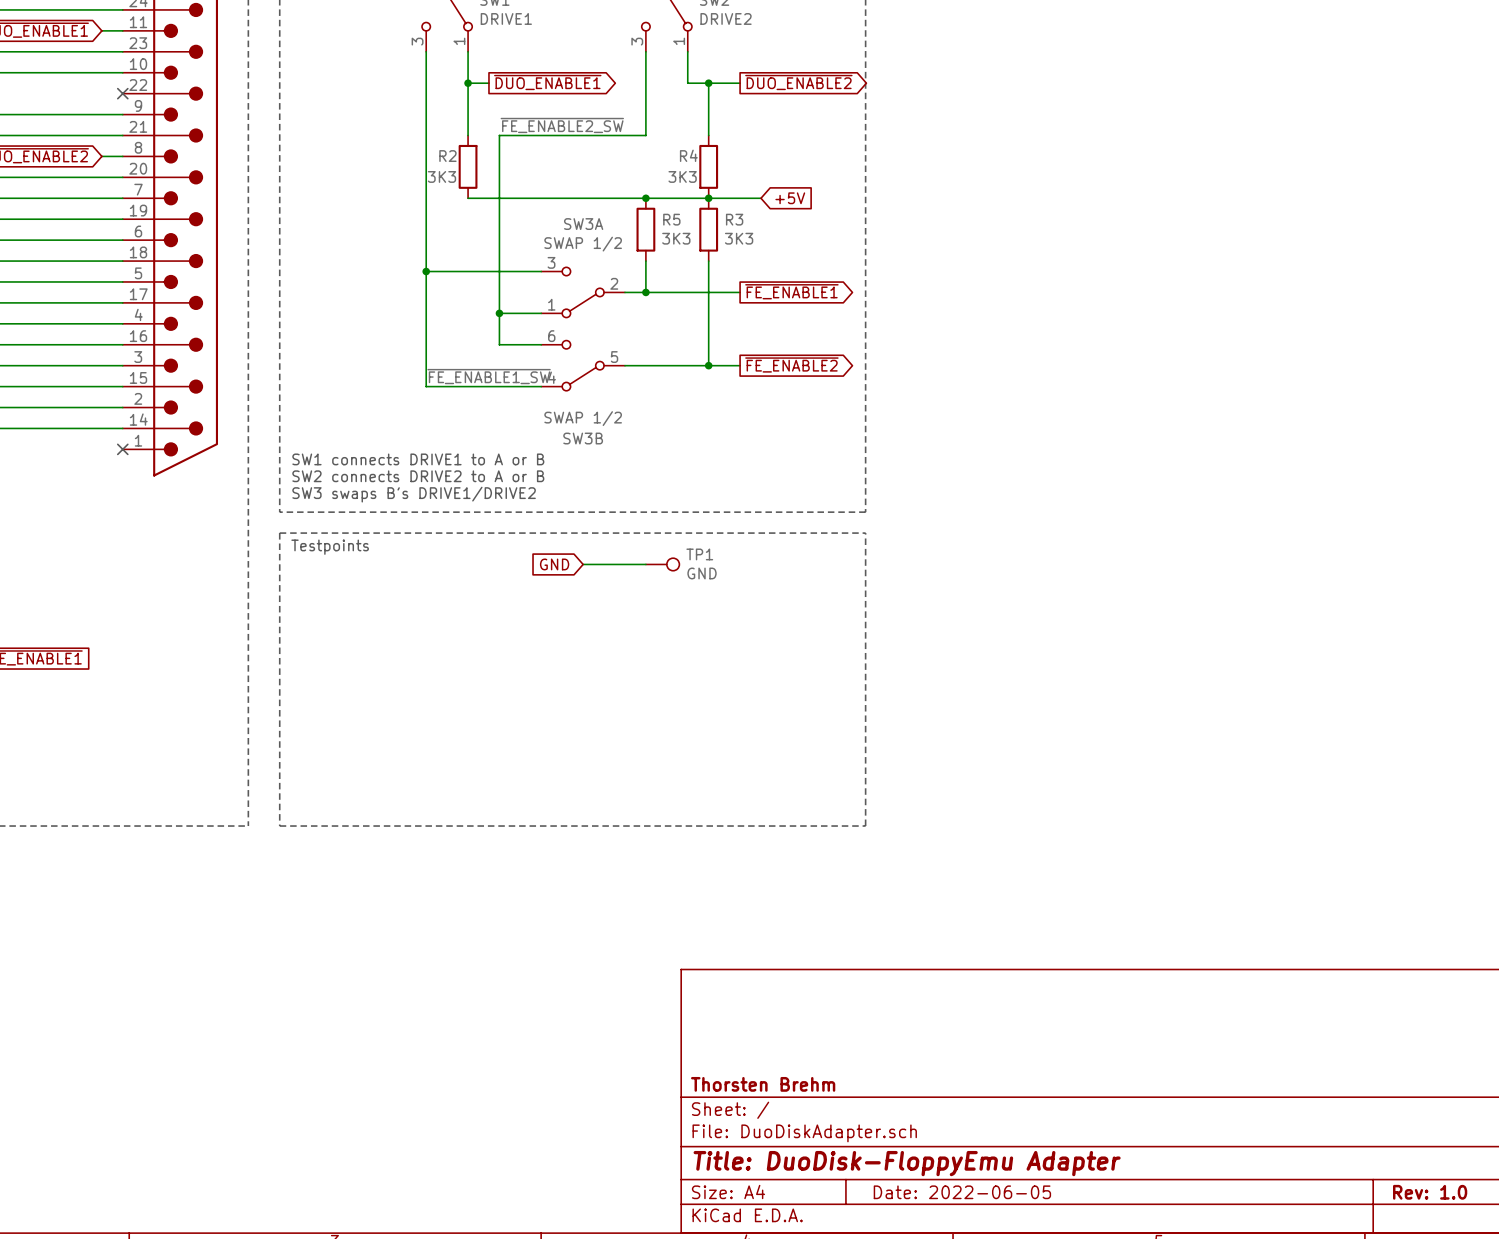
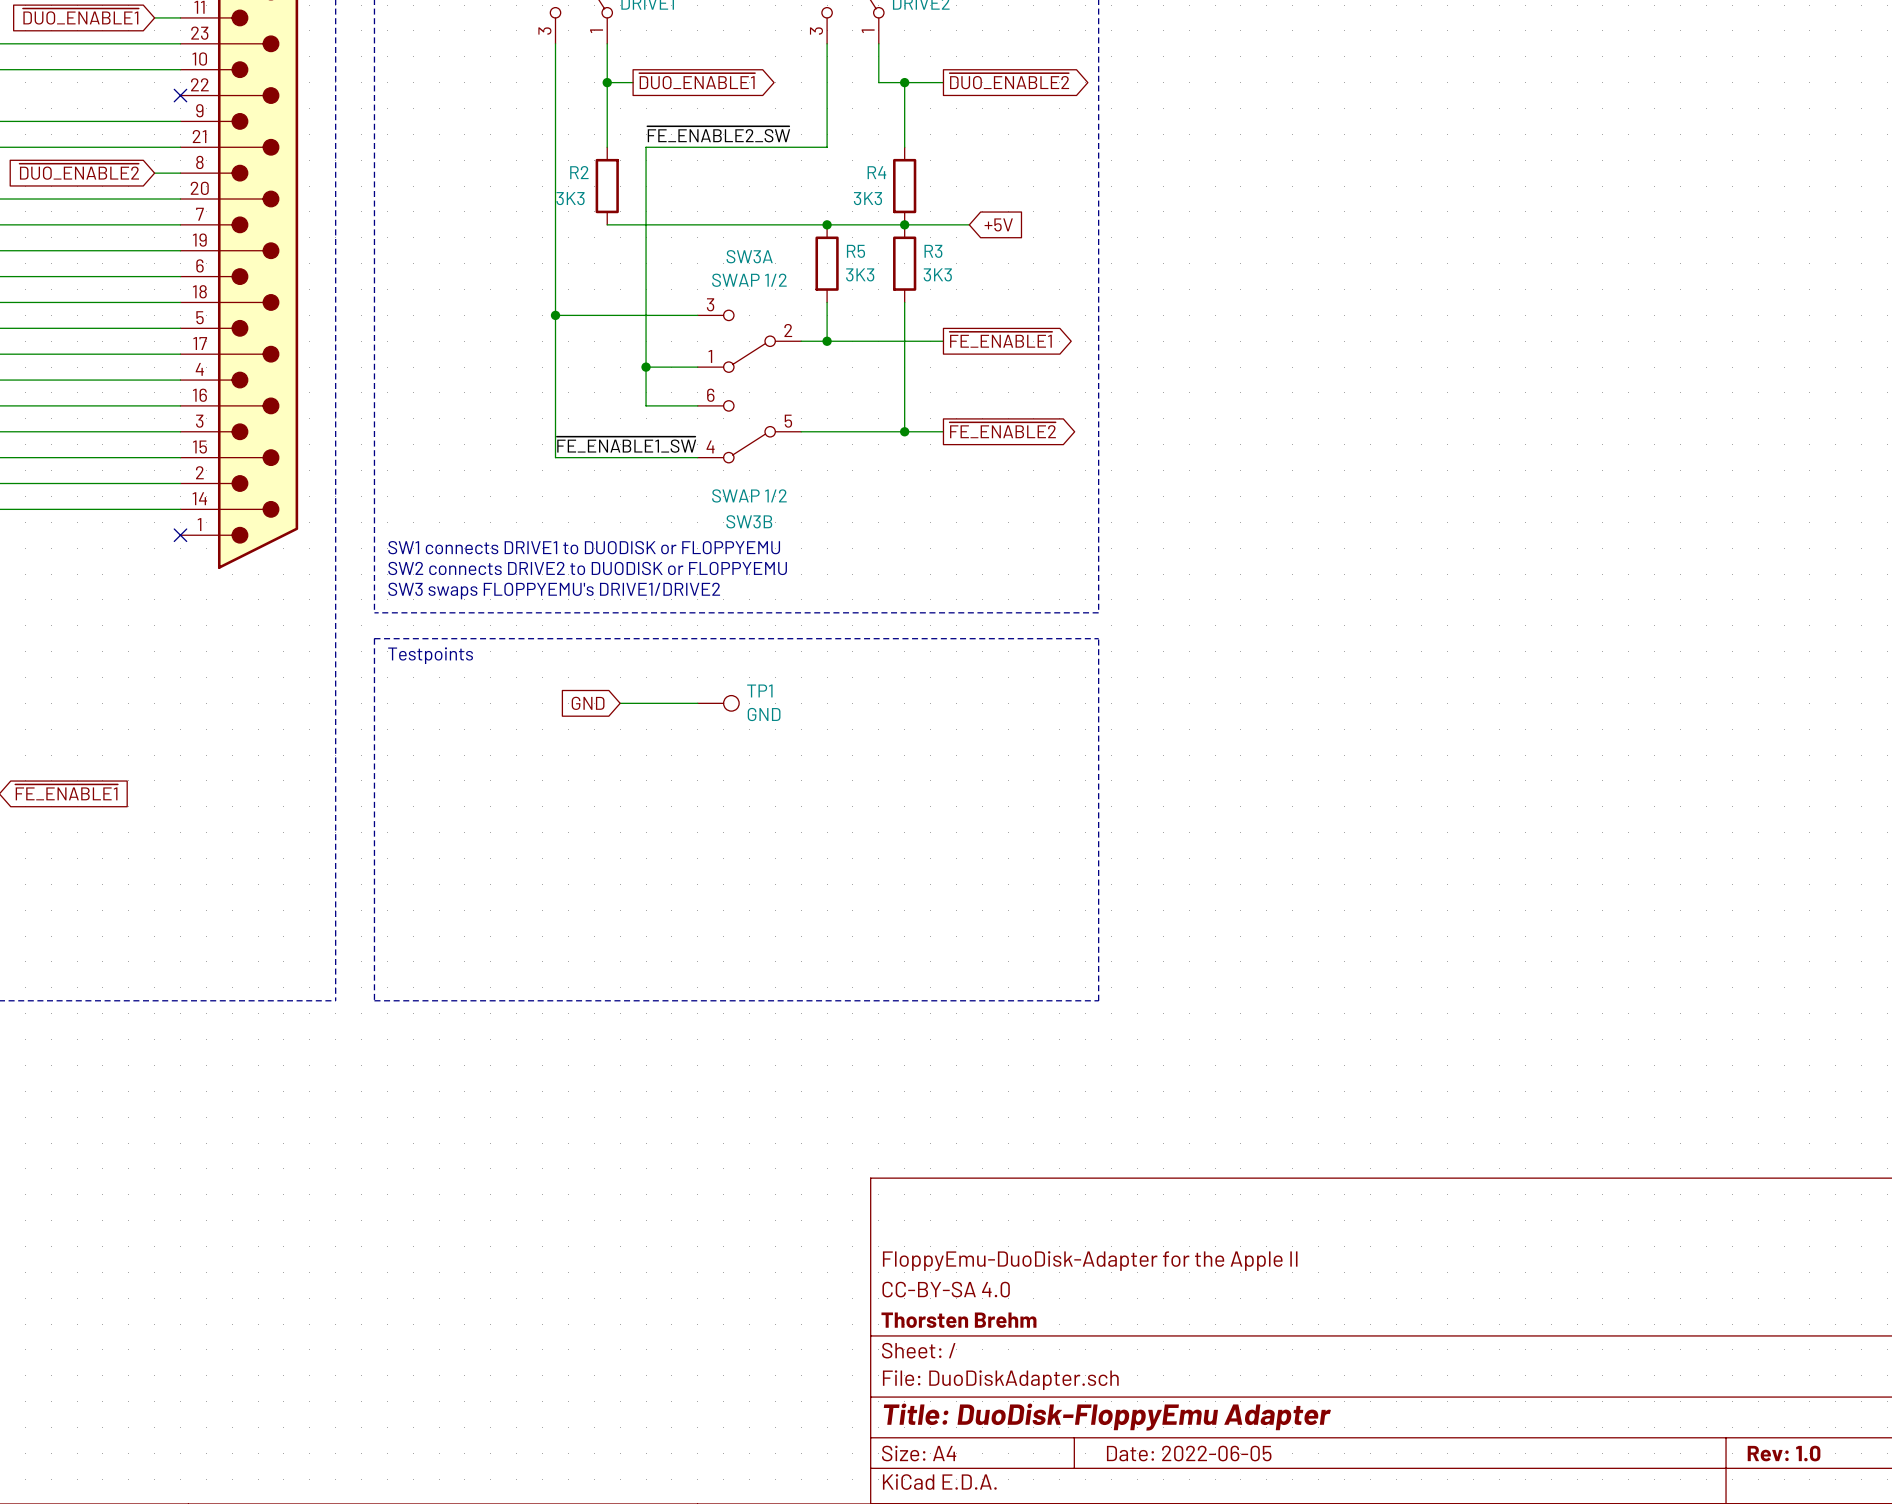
text: SW1 connects DRIVE1 to A or B (418, 459) -> SW1 connects DRIVE1 to DUODISK or FLOPPYEMU (584, 547)
text: SW2 connects DRIVE2 to A or B (418, 476) -> SW2 connects DRIVE2 to DUODISK or FLOPPYEMU (587, 568)
text: SW3 swaps B's DRIVE1/DRIVE2 (414, 494) -> SW3 swaps FLOPPYEMU's DRIVE1/DRIVE2 (554, 591)
global label position: GND (554, 564) -> GND (588, 703)
wire: (583, 564) (645, 564) -> (620, 703) (697, 703)
TP1 position: (662, 564) -> (718, 703)
title block: none -> FloppyEmu-DuoDisk-Adapter for the Apple II (1090, 1261)
title block: none -> CC-BY-SA 4.0 (946, 1289)

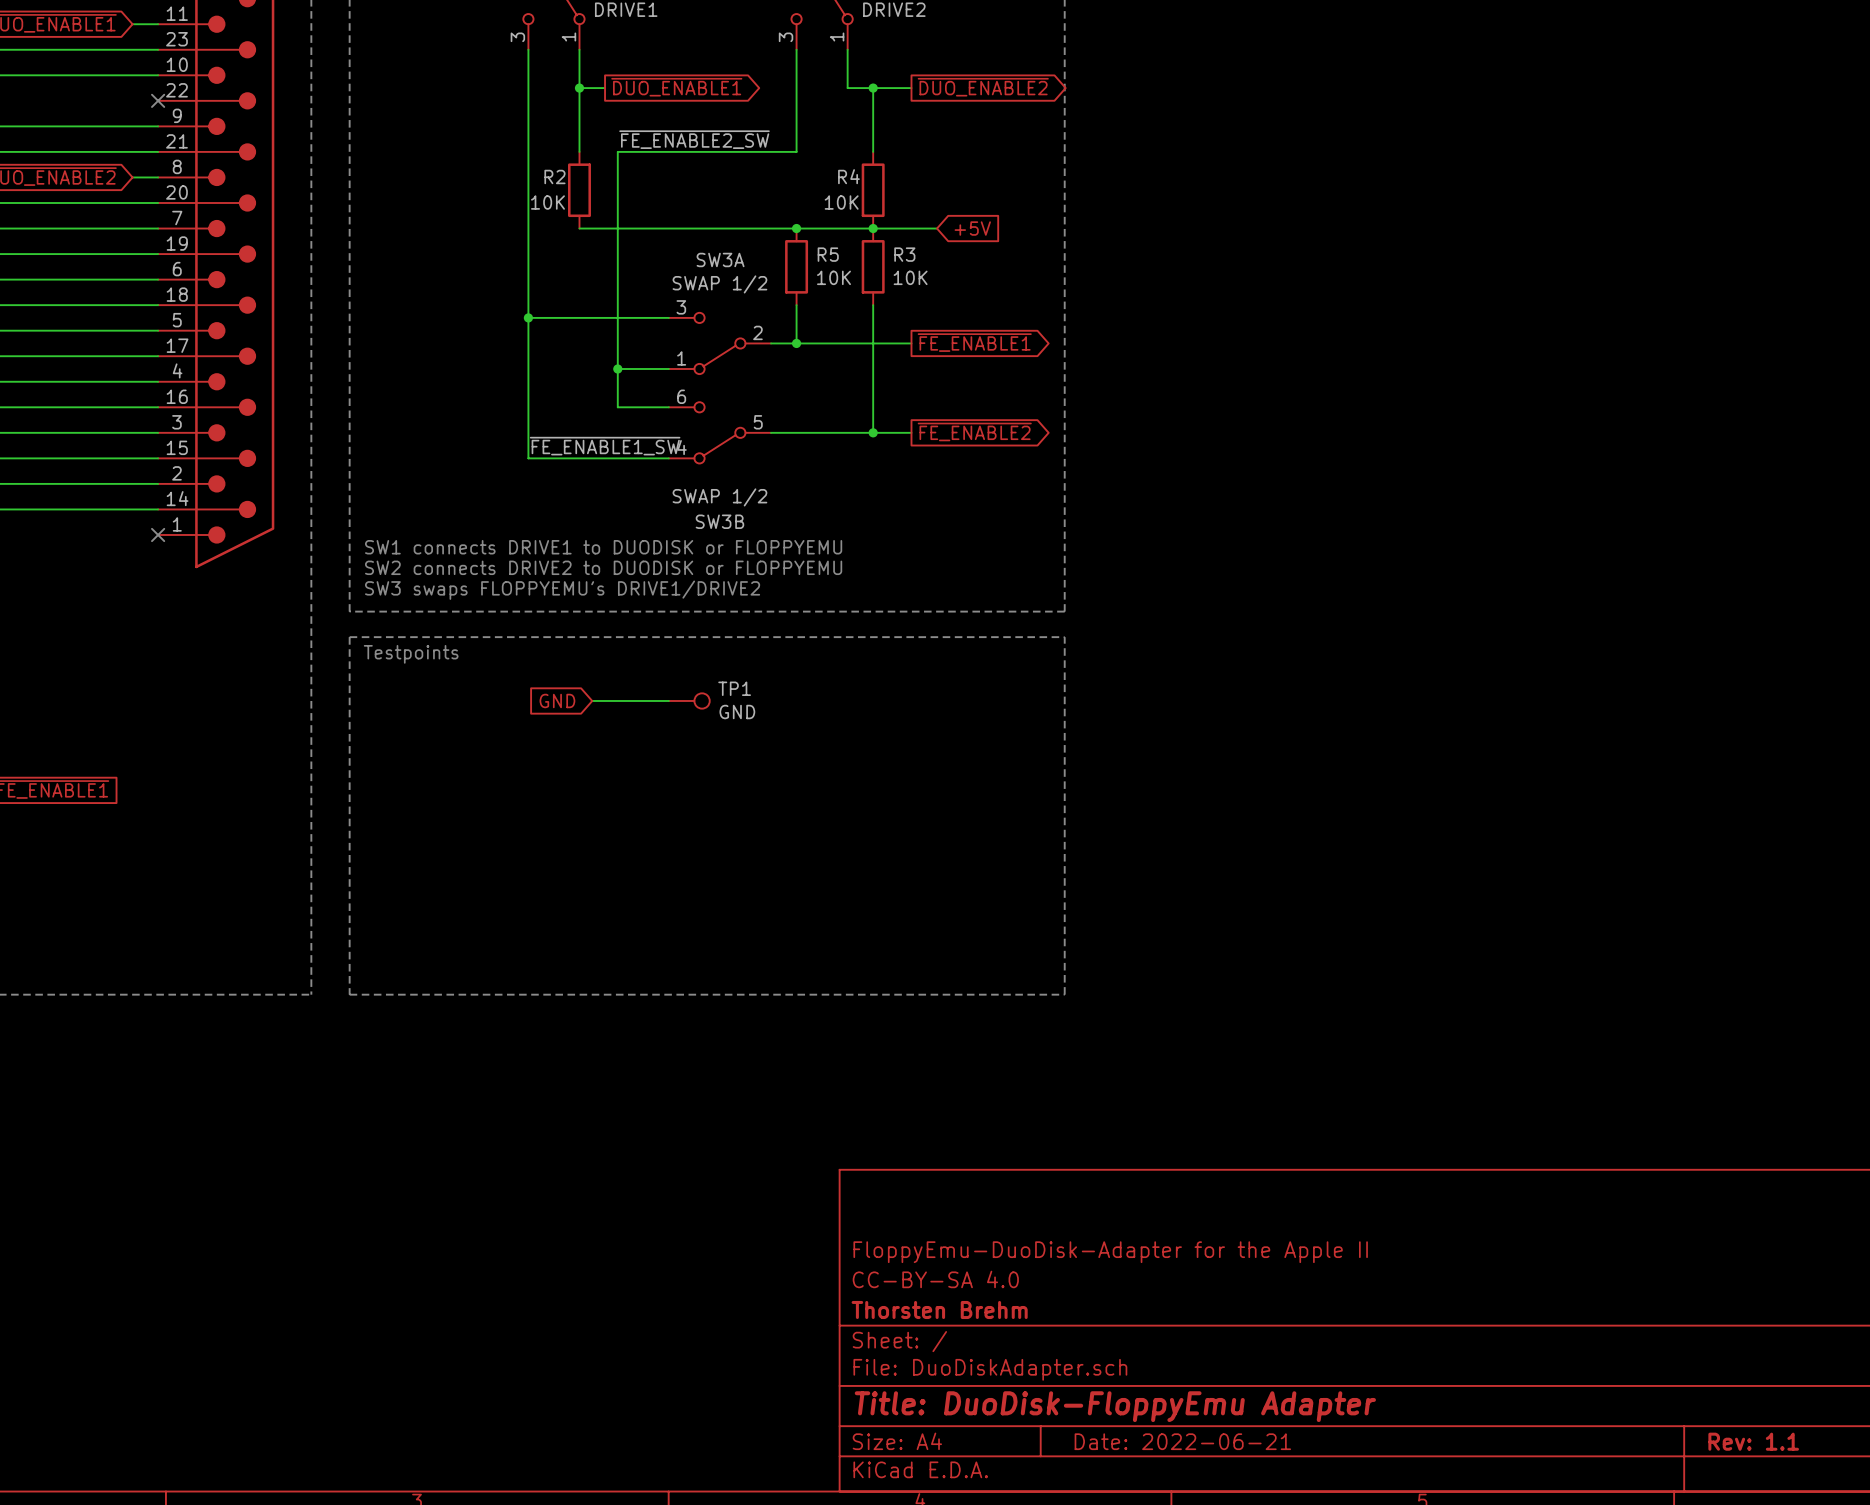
R2 value: 3K3 (570, 198) -> 10K (547, 202)
R4 value: 3K3 (867, 198) -> 10K (841, 202)
R5 value: 3K3 (860, 274) -> 10K (833, 277)
R3 value: 3K3 (937, 274) -> 10K (910, 277)
title block: Date: 2022-06-05 (1189, 1453) -> Date: 2022-06-21 (1182, 1441)
title block: Rev: 1.0 (1784, 1453) -> Rev: 1.1 (1753, 1441)

